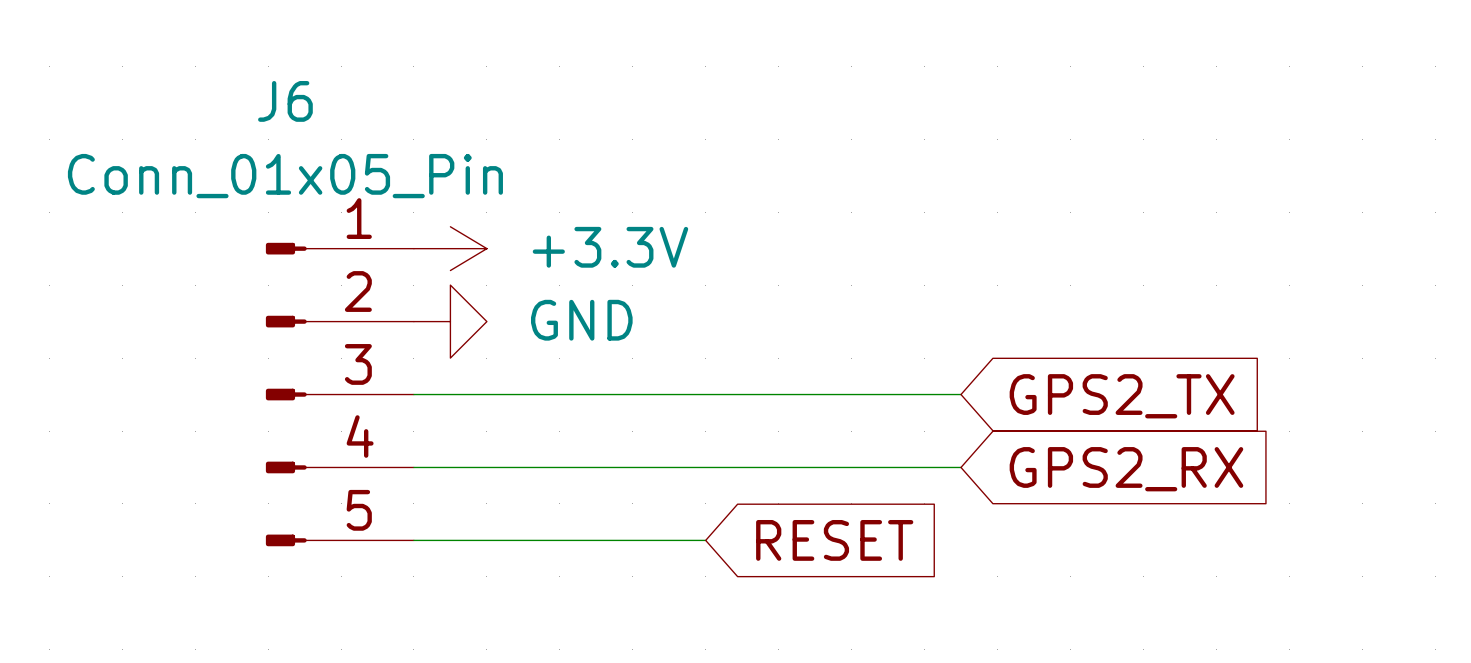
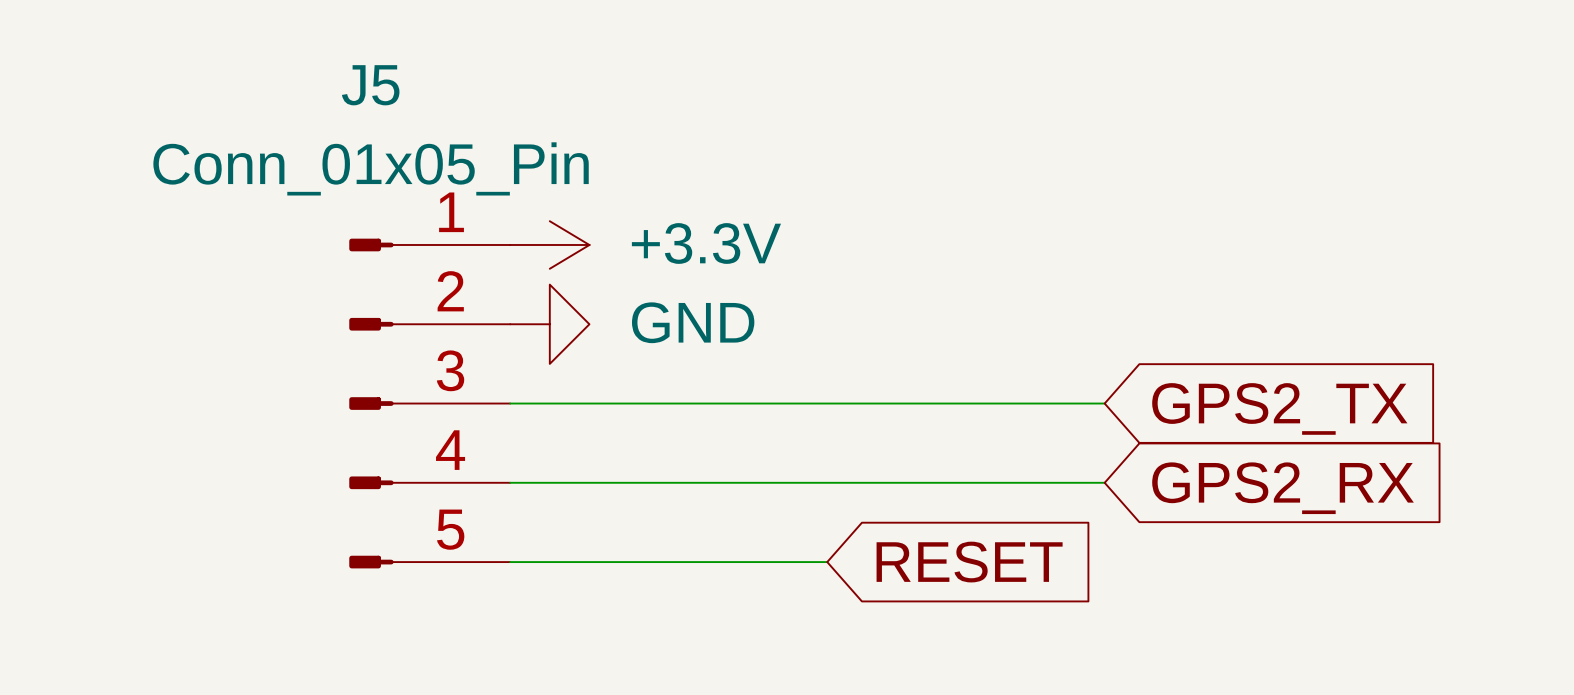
J6 name: J6 (285, 101) -> J5 (370, 85)

